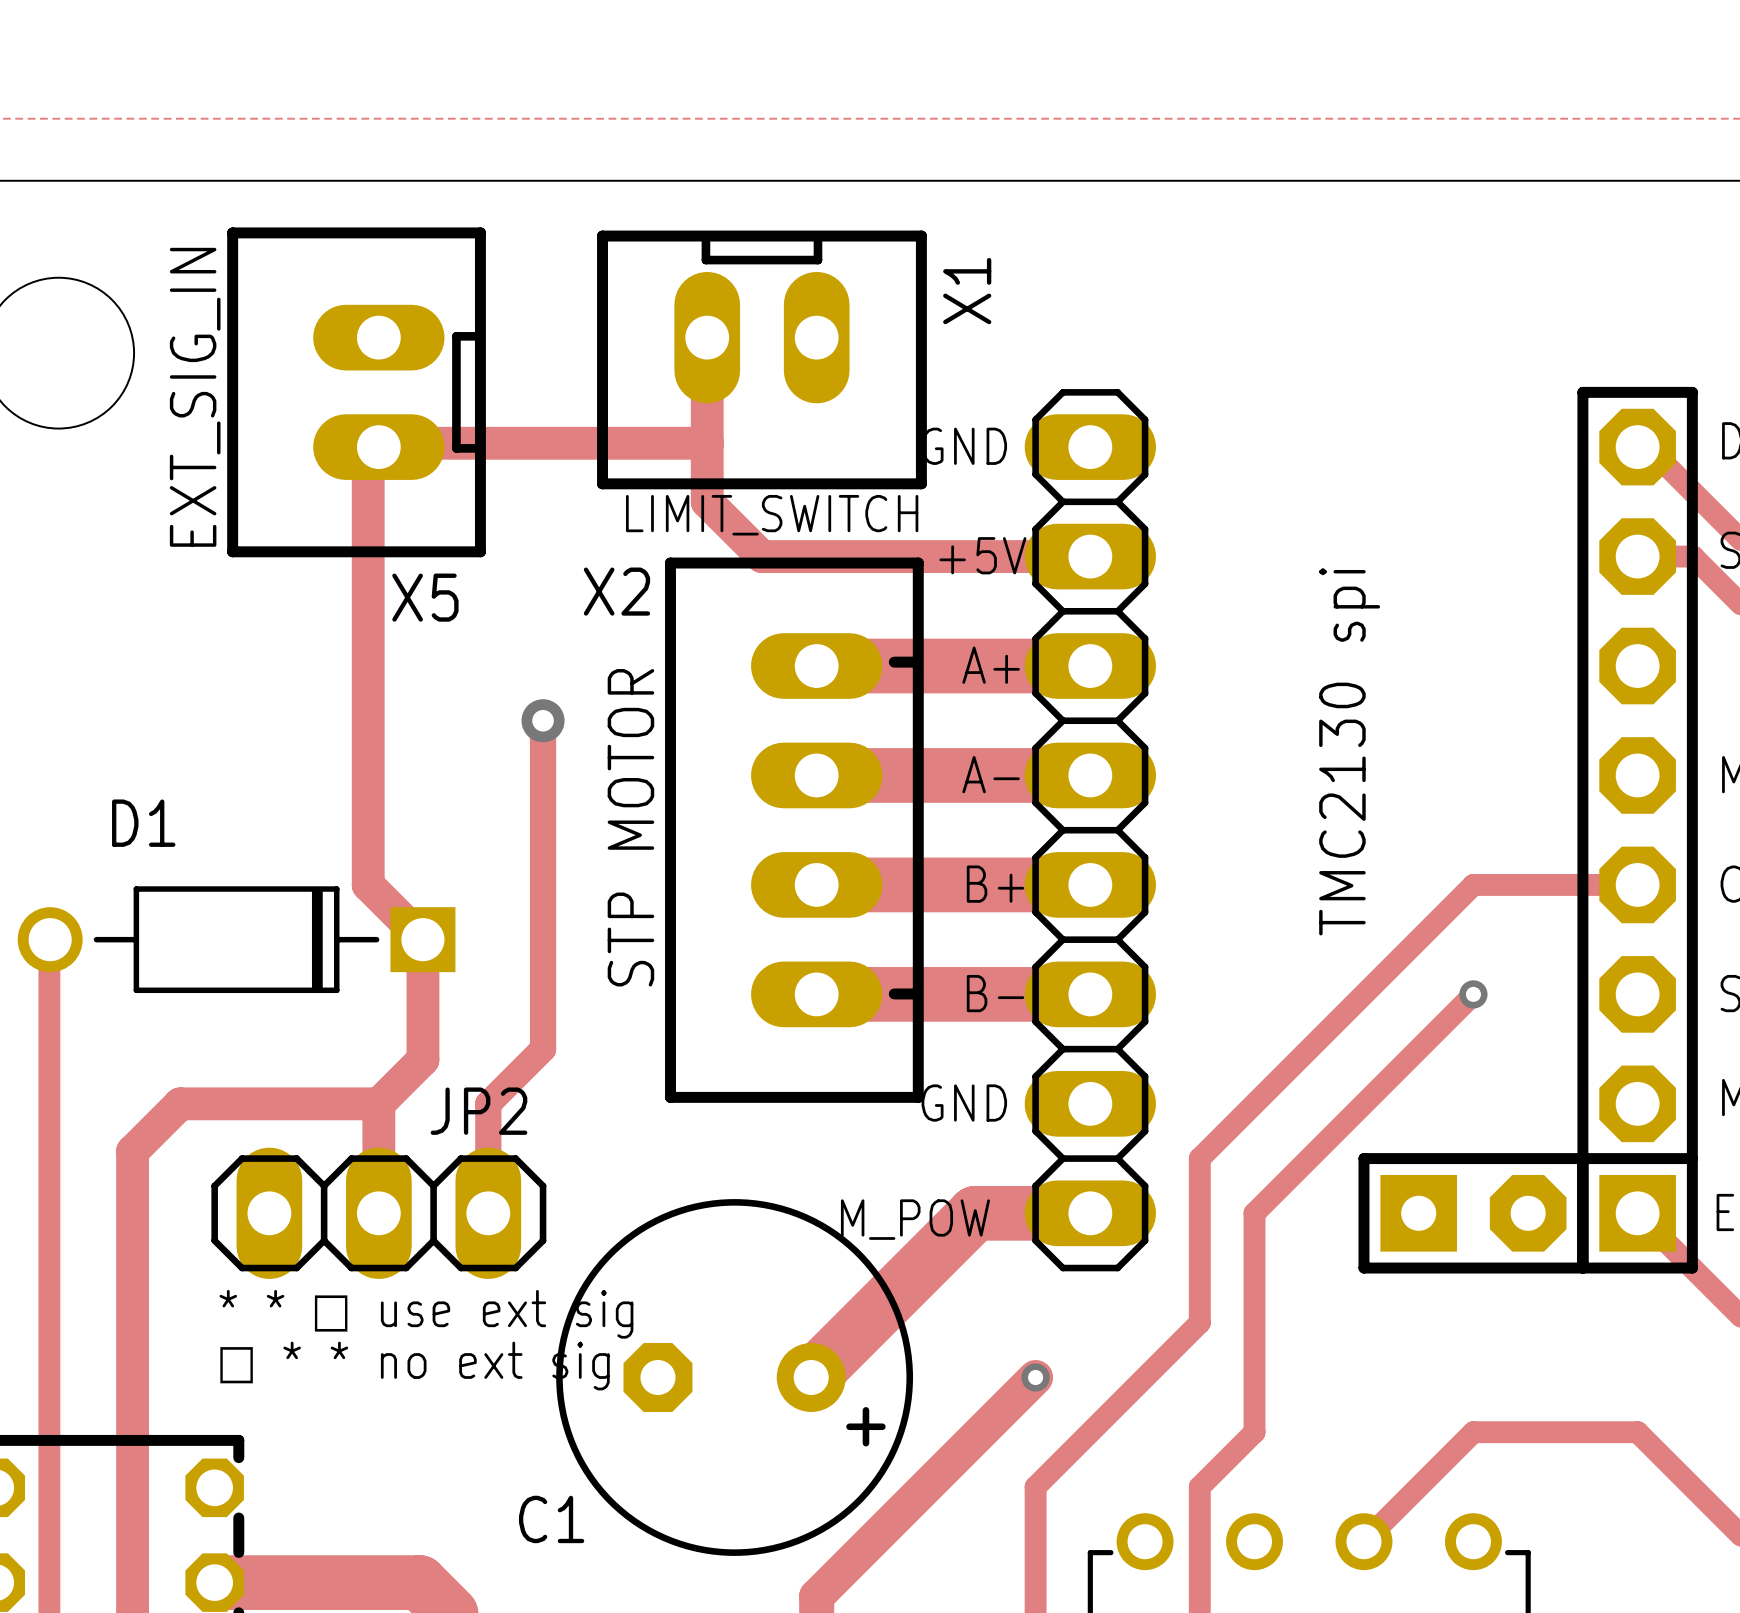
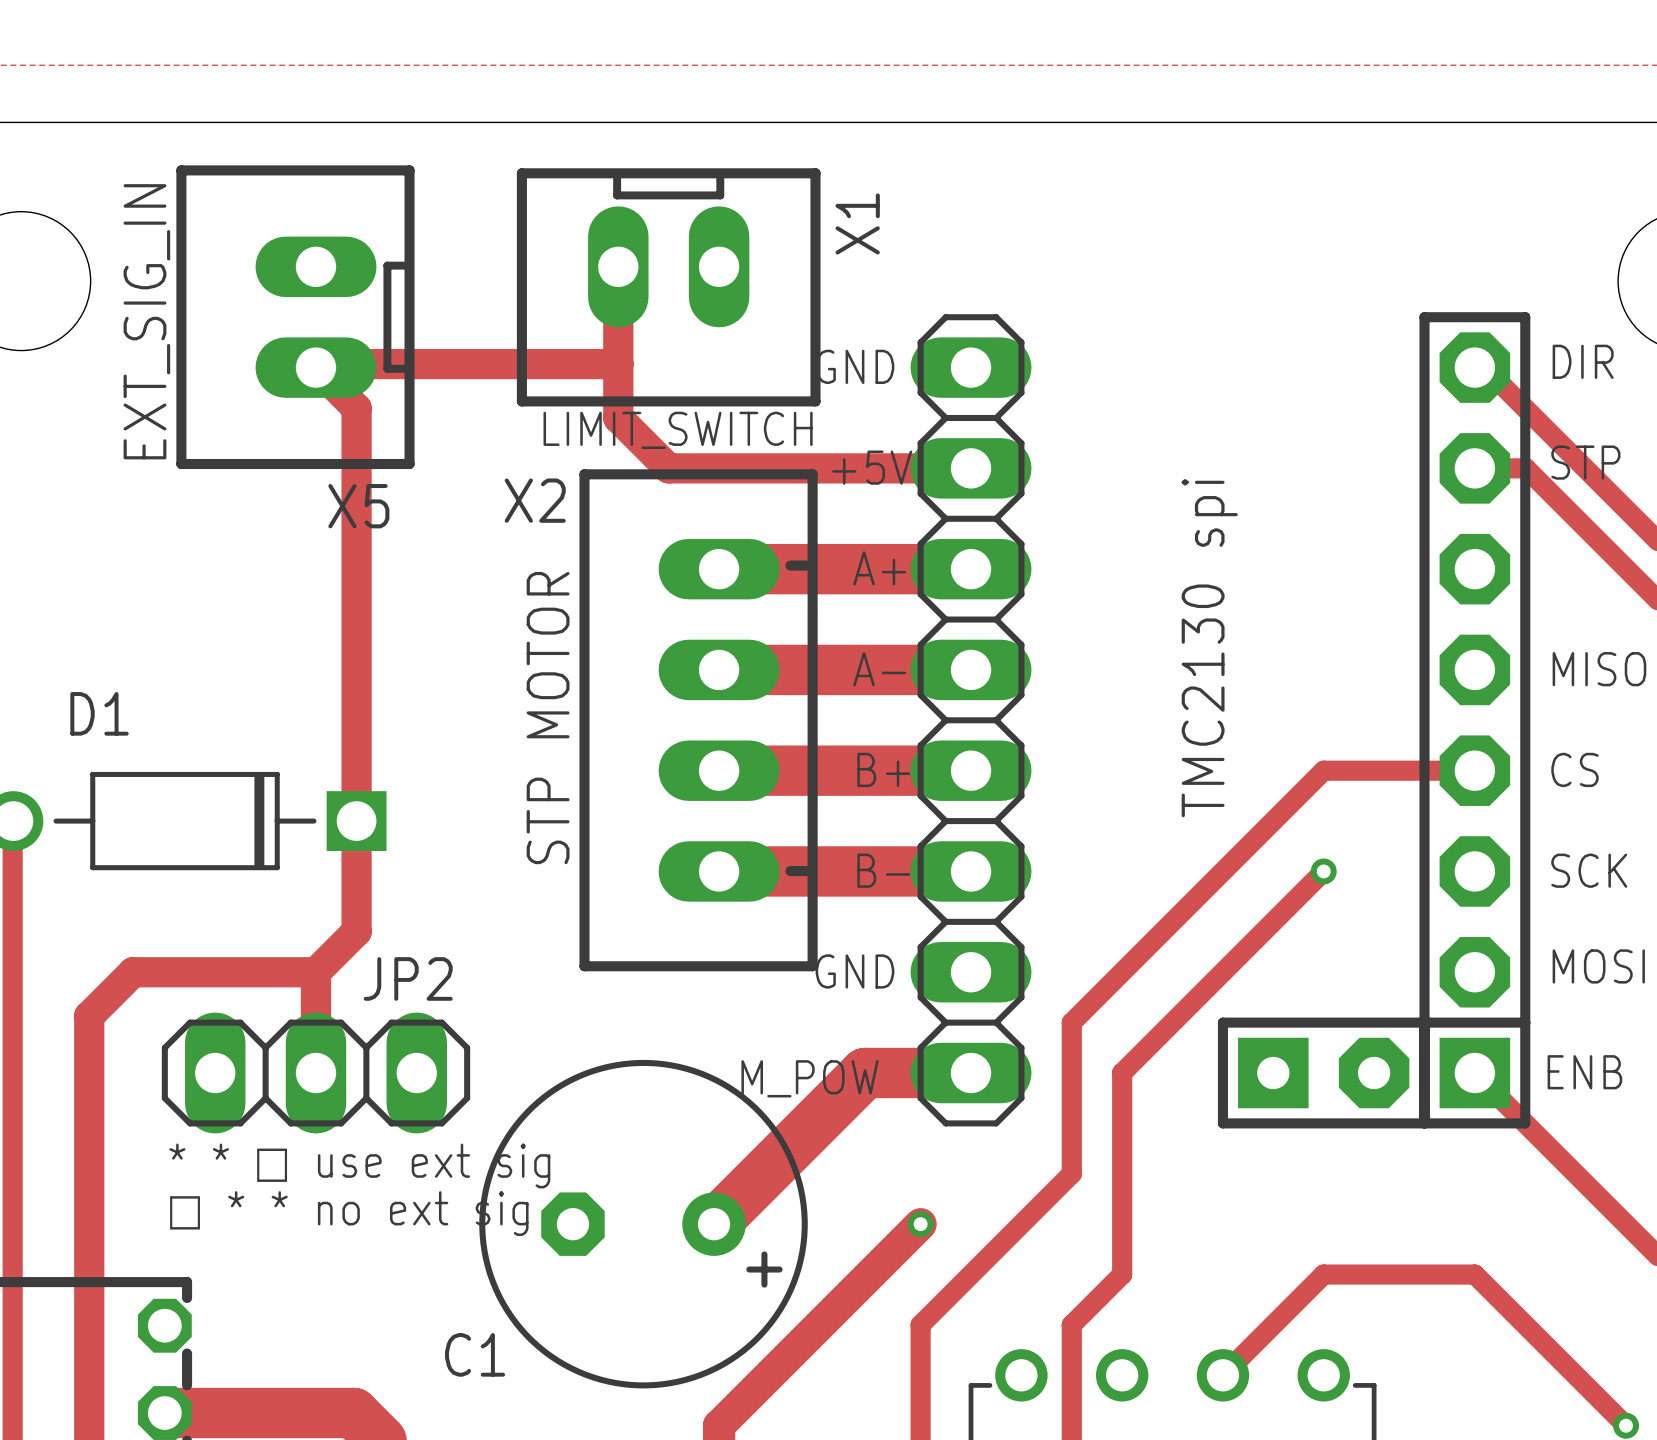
track: (378, 447) (368, 457) (368, 884) (422, 939) -> (316, 367) (356, 408) (356, 821)
track: (543, 720) (543, 1049) (488, 1103) (488, 1213) -> none
via: (543, 720) -> none

